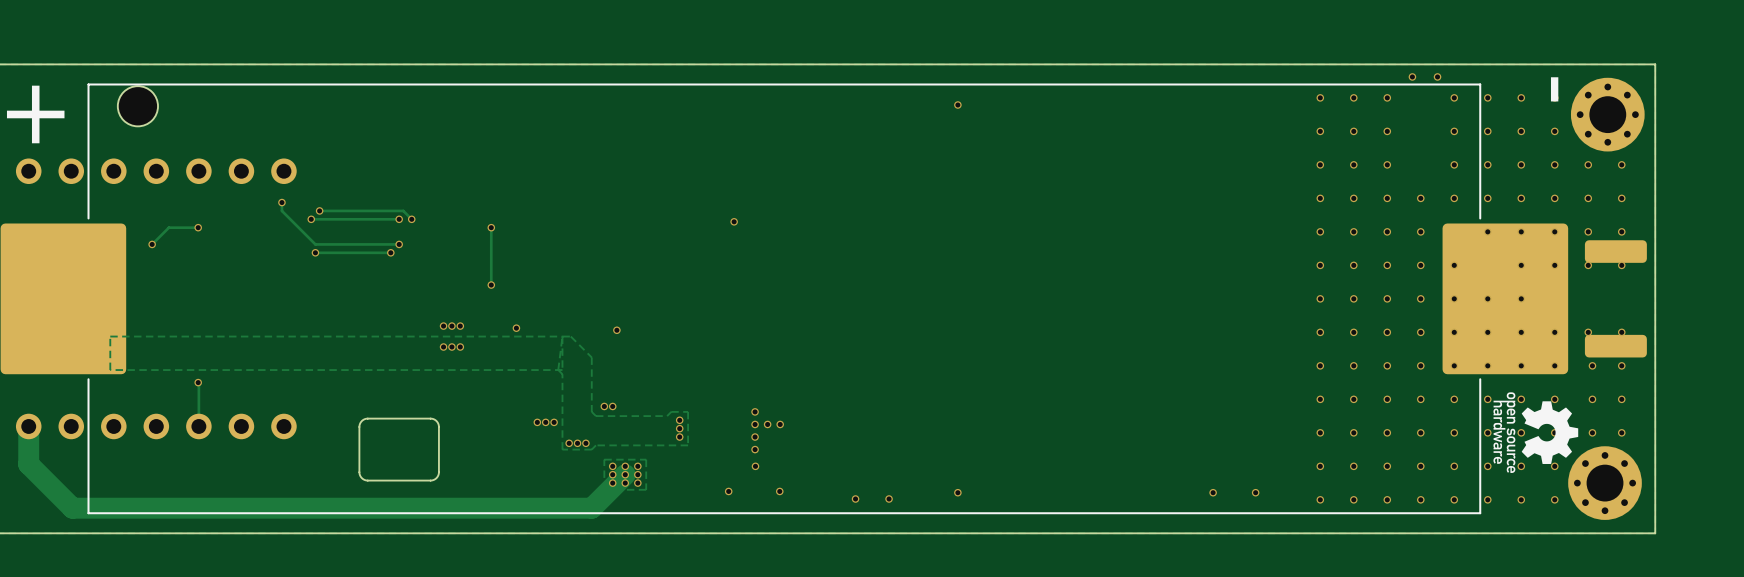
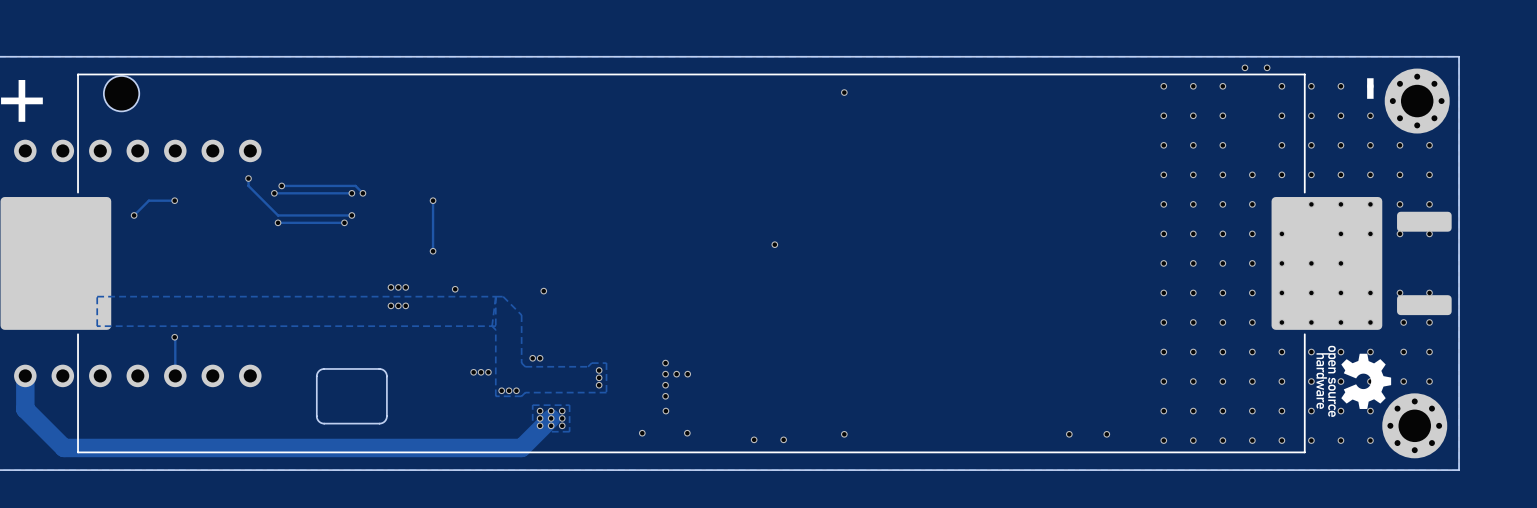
via: (734, 221) -> none
via: none -> (774, 244)

